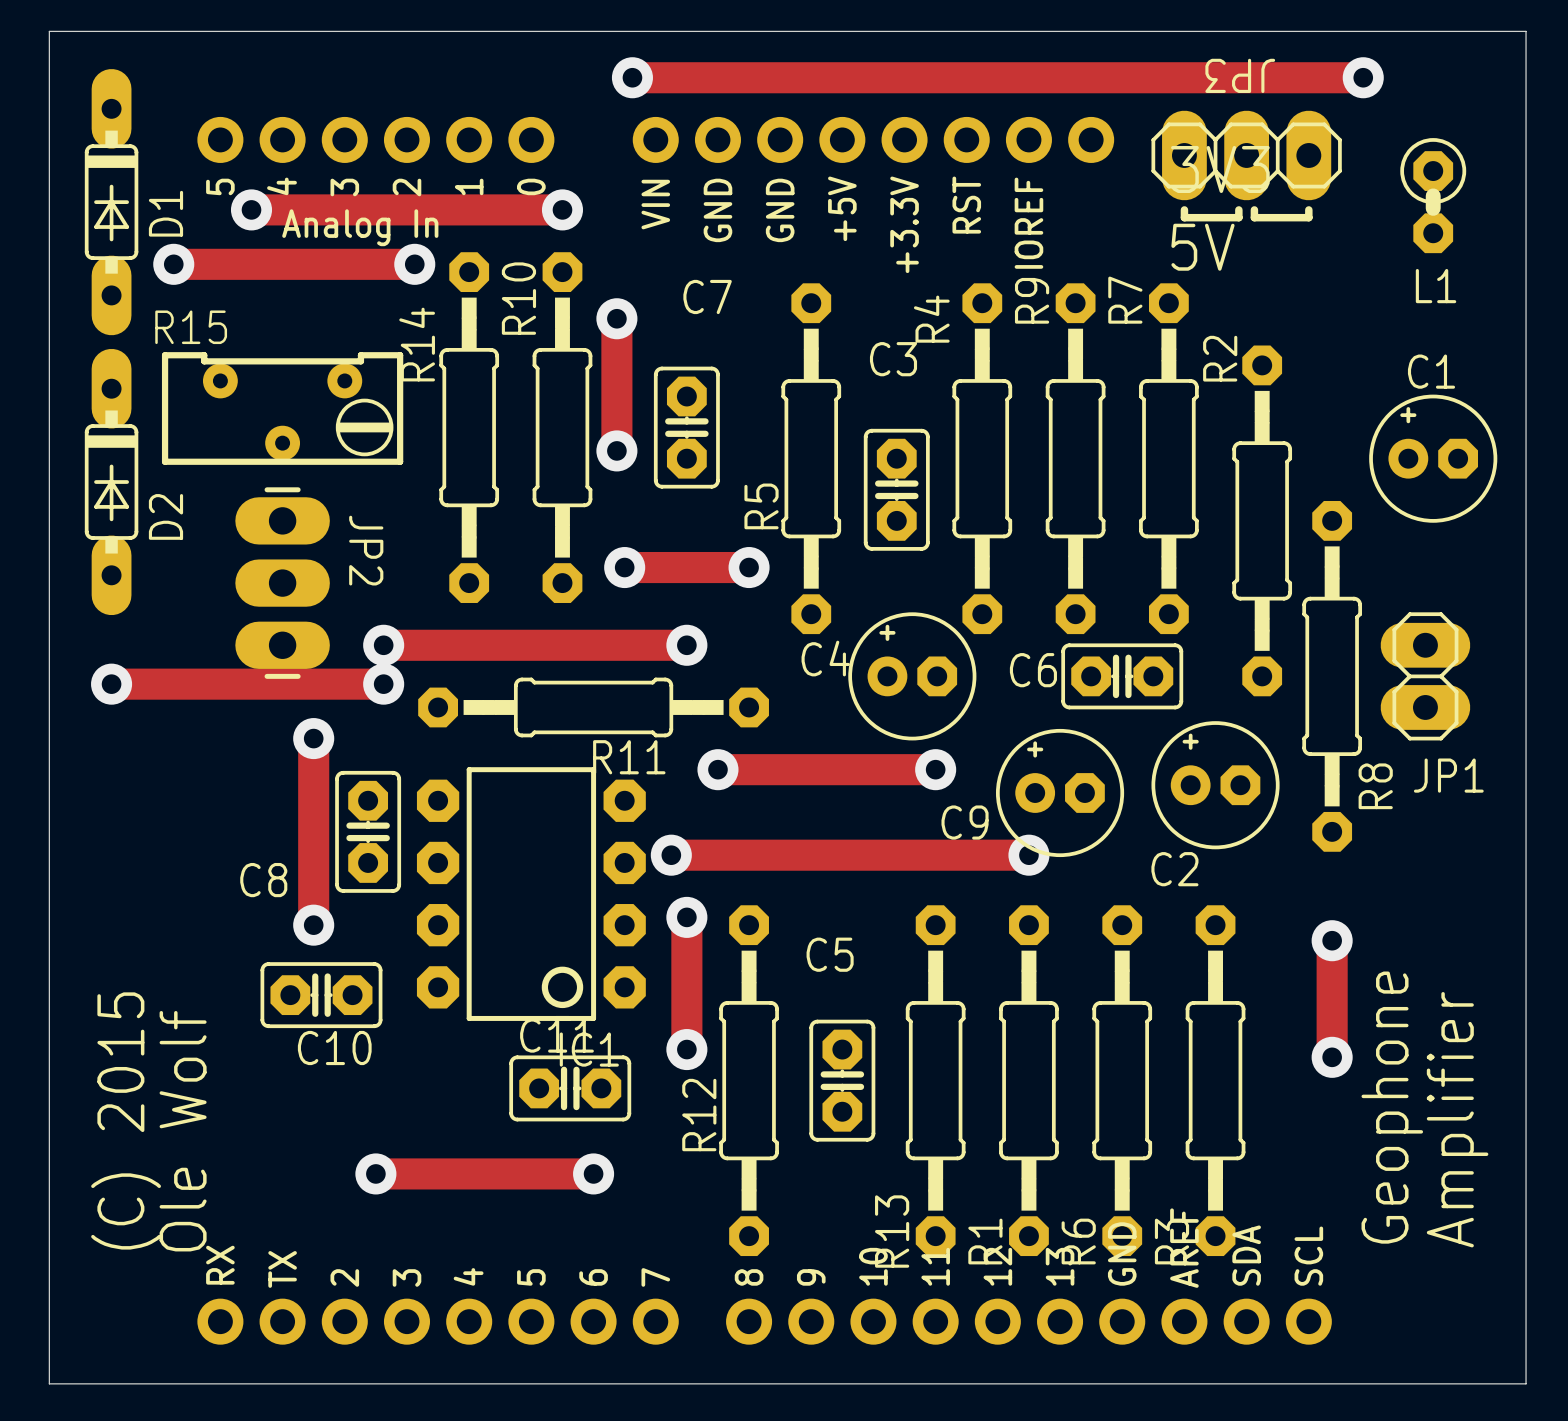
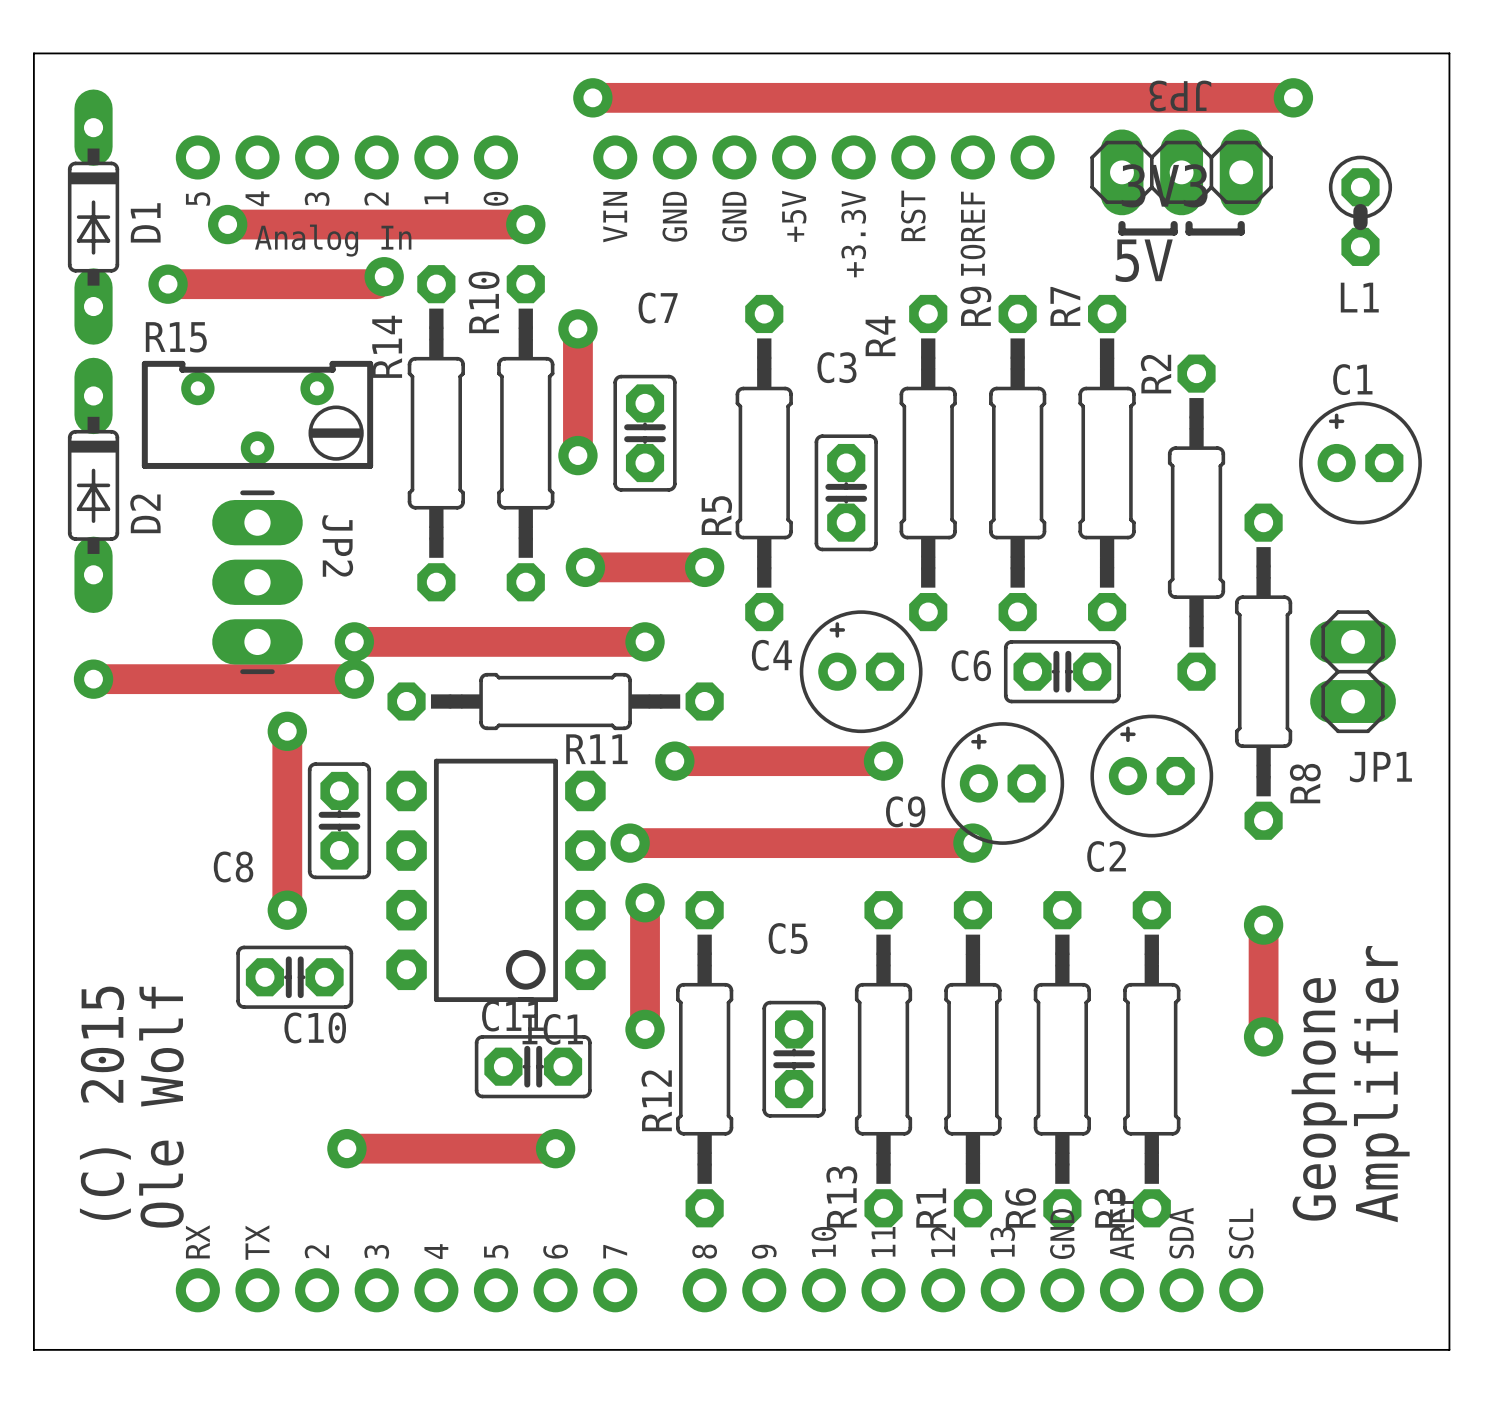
track: (173, 264) (414, 264) -> none
via position: (173, 264) -> (168, 284)
track: none -> (168, 284) (376, 284)

